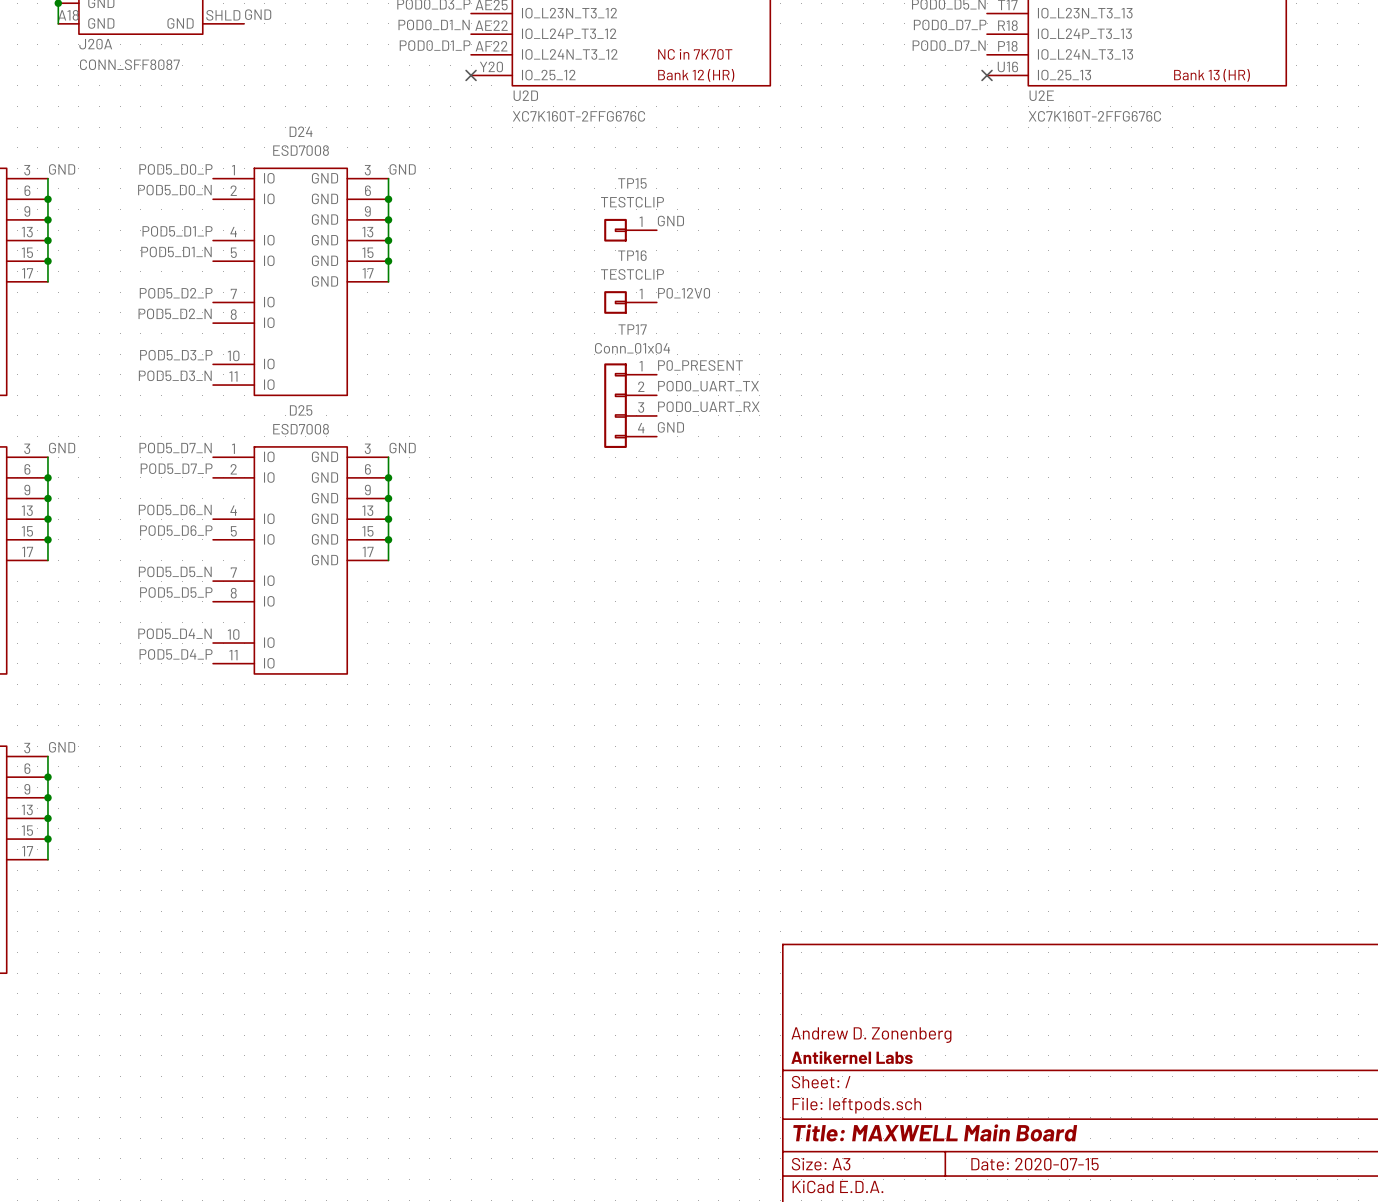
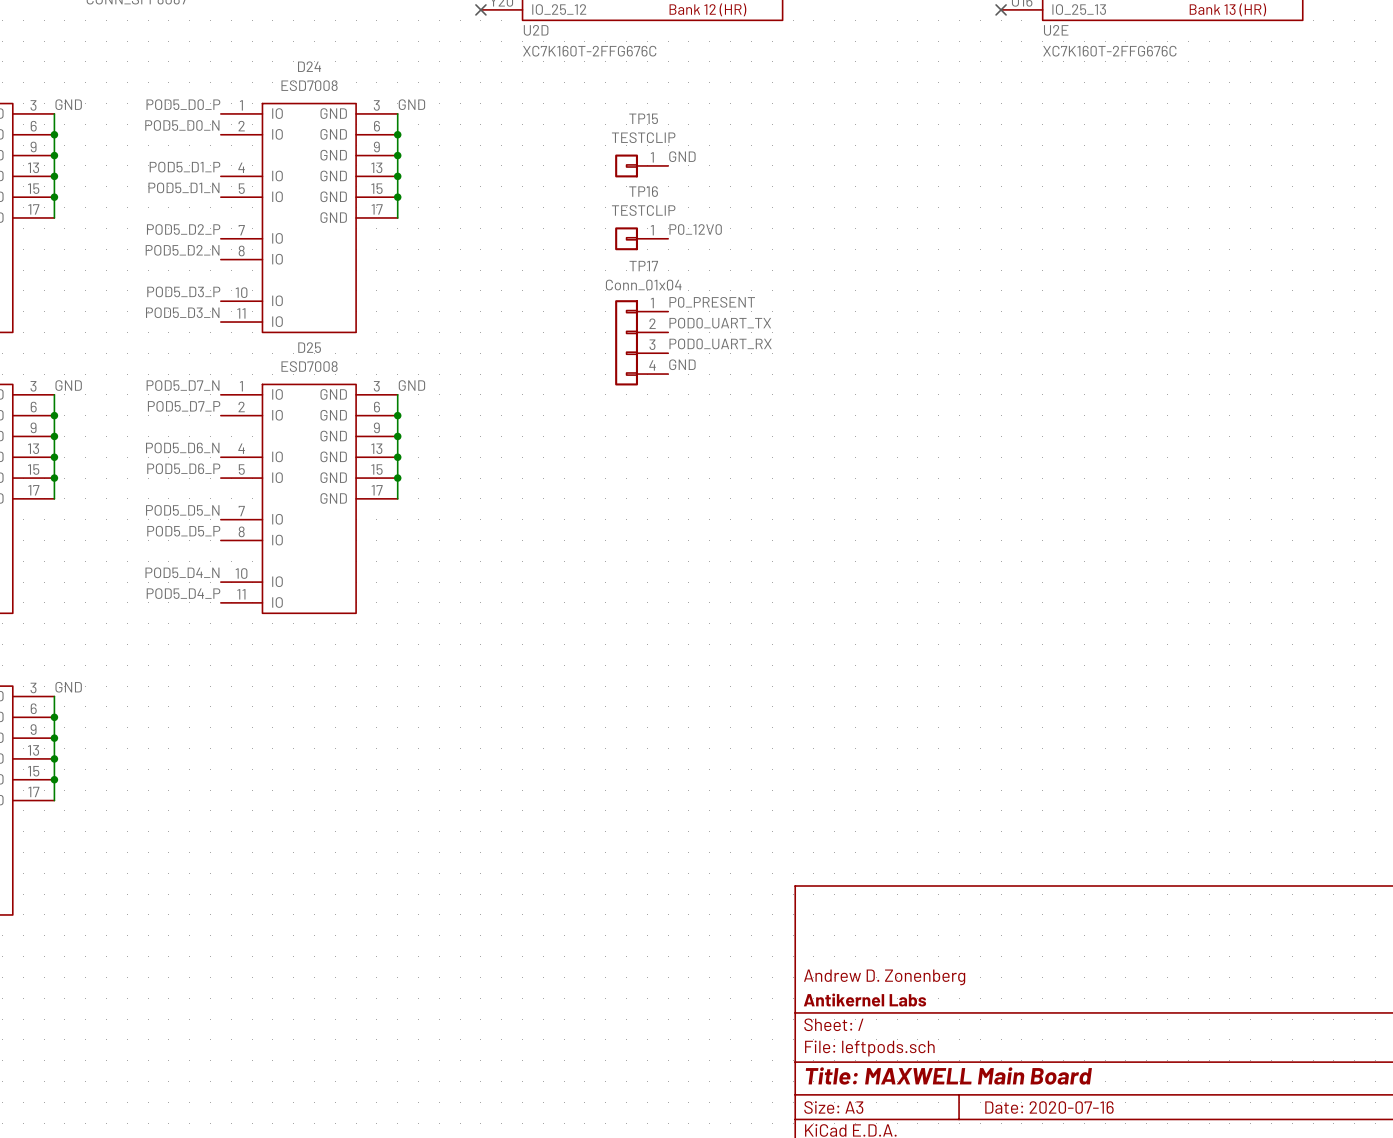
title block: Date: 2020-07-15 (1035, 1164) -> Date: 2020-07-16 (1049, 1107)

